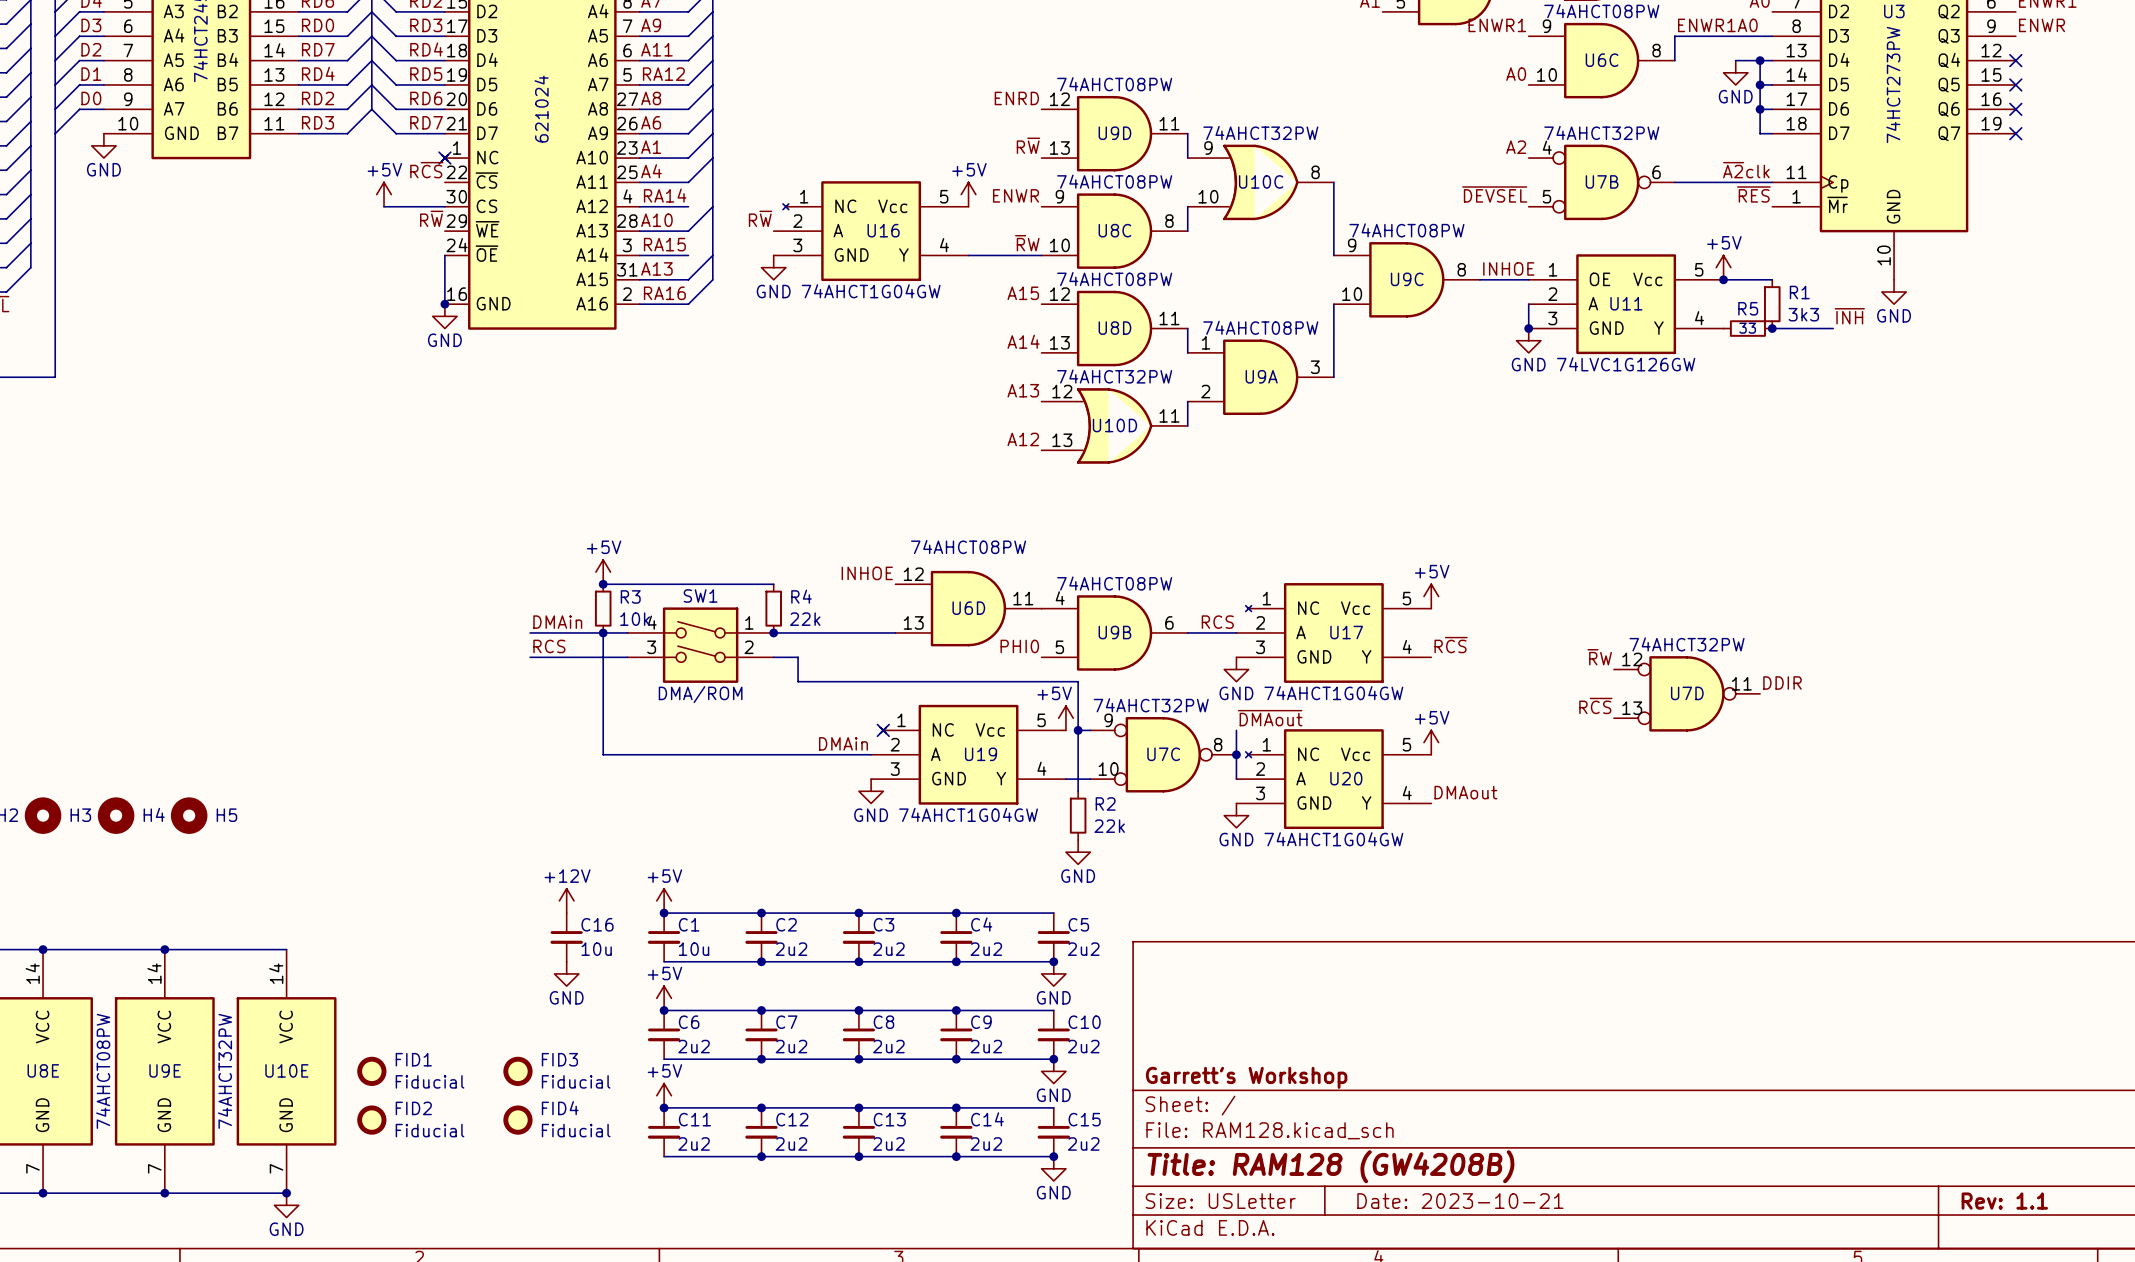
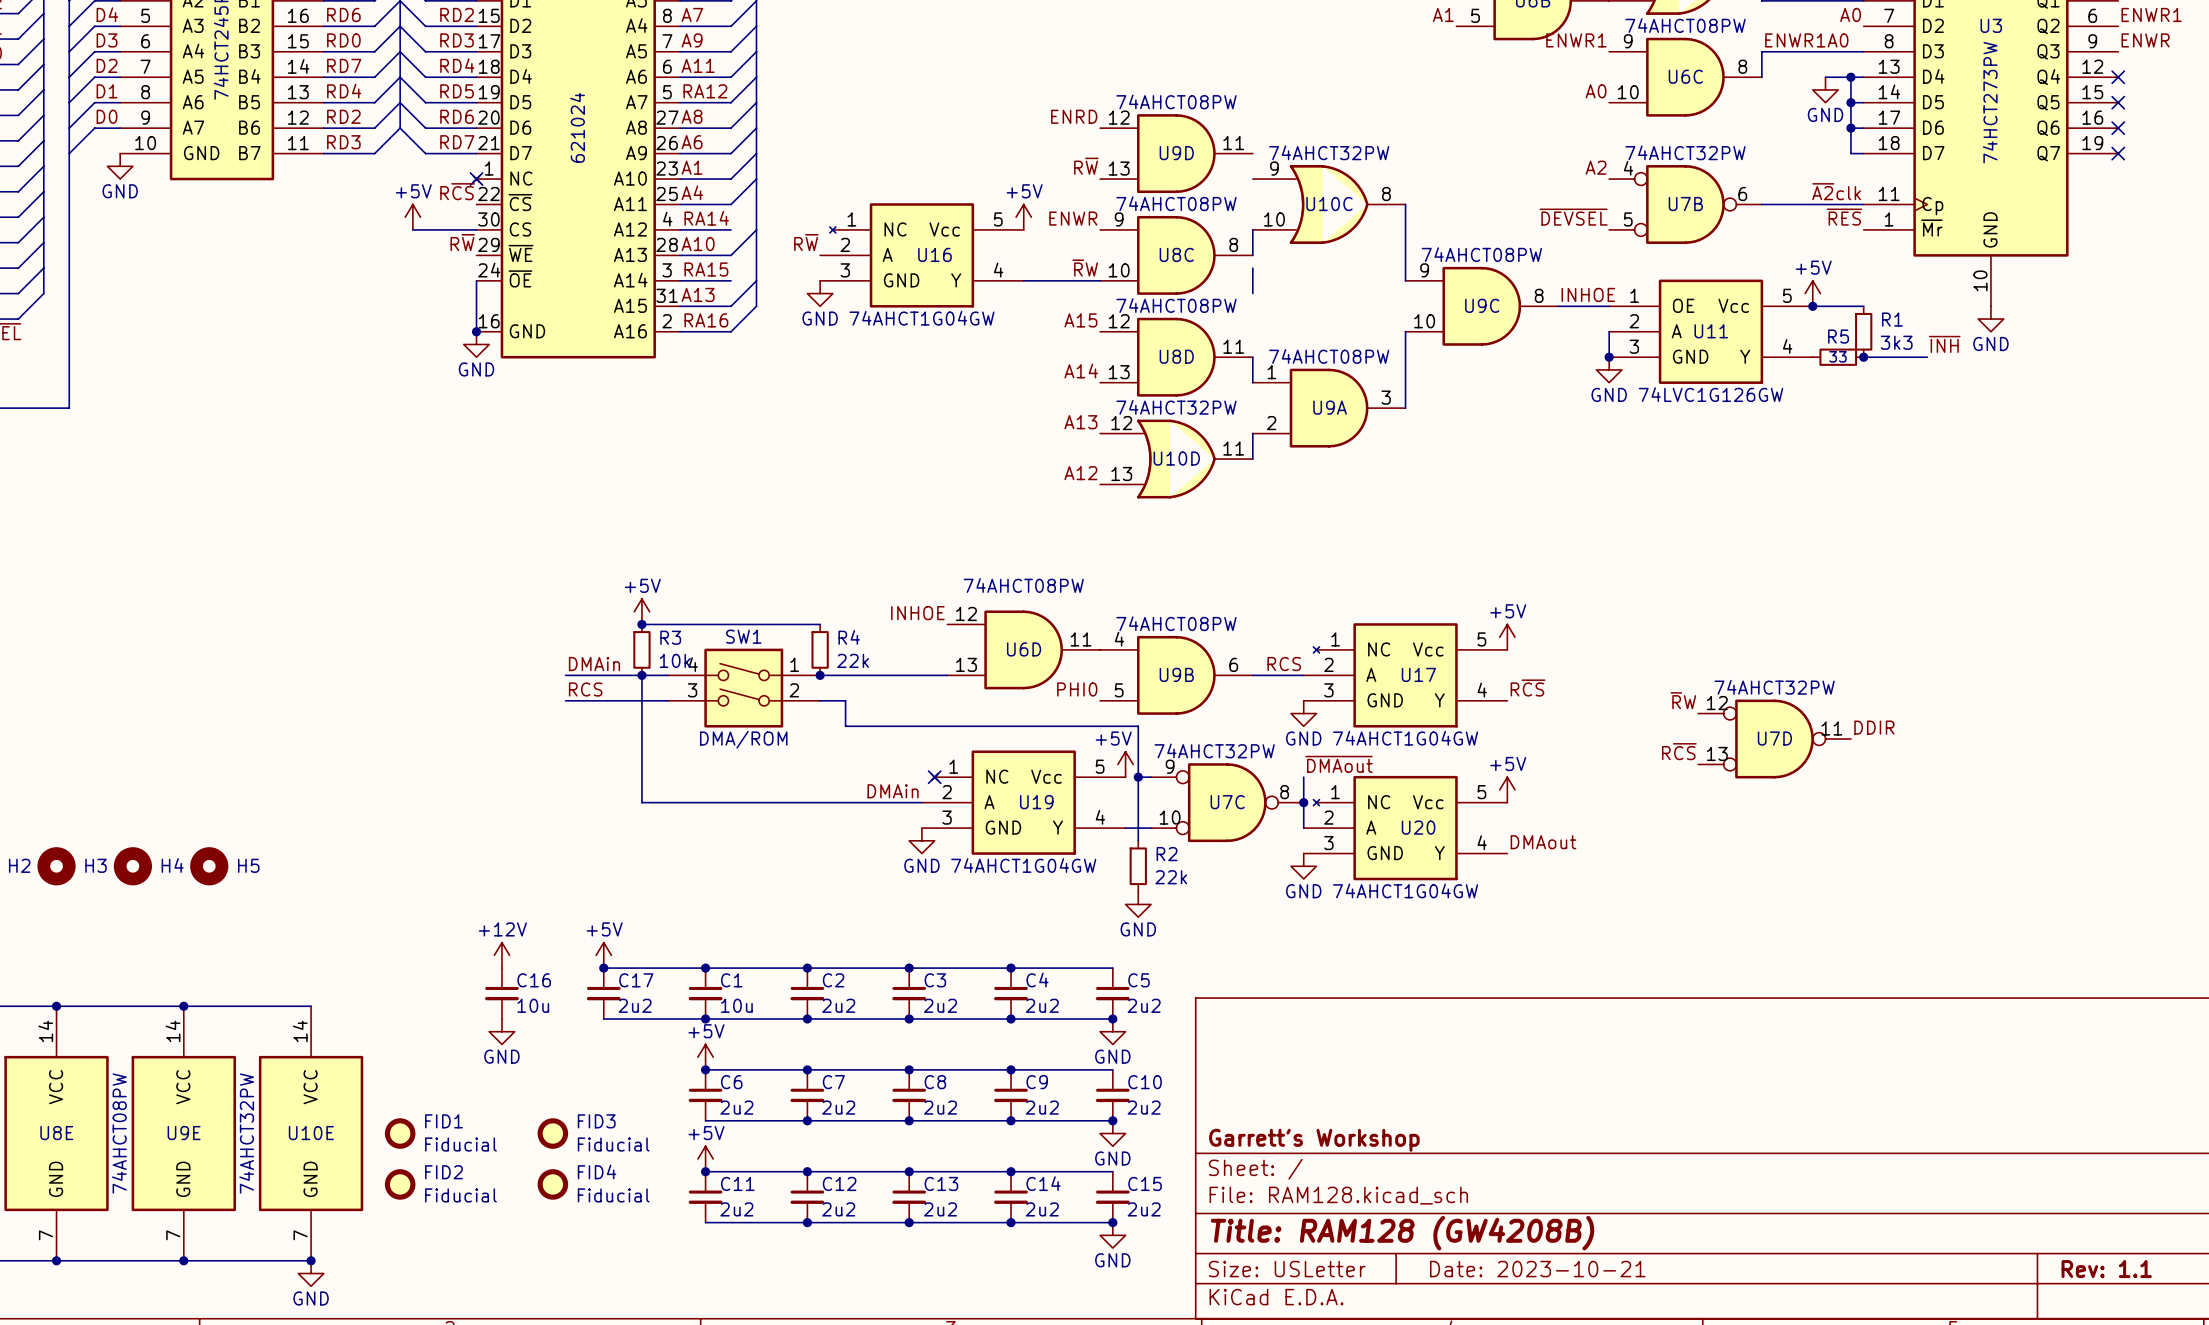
wire: (1187, 133) (1187, 158) -> (1252, 268) (1252, 293)
power symbol: none -> +12V (501, 955)
power symbol: +12V (566, 900) -> +5V (603, 955)
power symbol: +5V (664, 900) -> none
wire: none -> (603, 968) (705, 968)
junction: none -> (603, 968)
C16 name: C16 (597, 924) -> C17 (636, 980)
C16: none -> 10u (501, 993)
C16 value: 10u (596, 949) -> 2u2 (635, 1005)
wire: none -> (603, 1018) (705, 1018)
junction: none -> (705, 1018)
power symbol position: GND (566, 973) -> GND (501, 1031)

